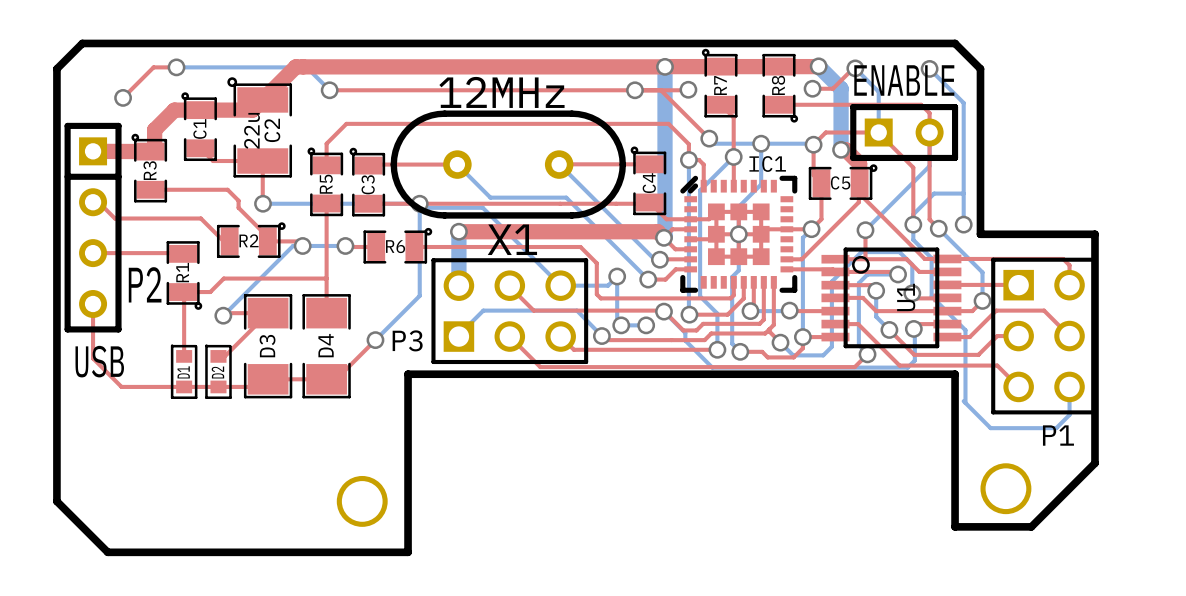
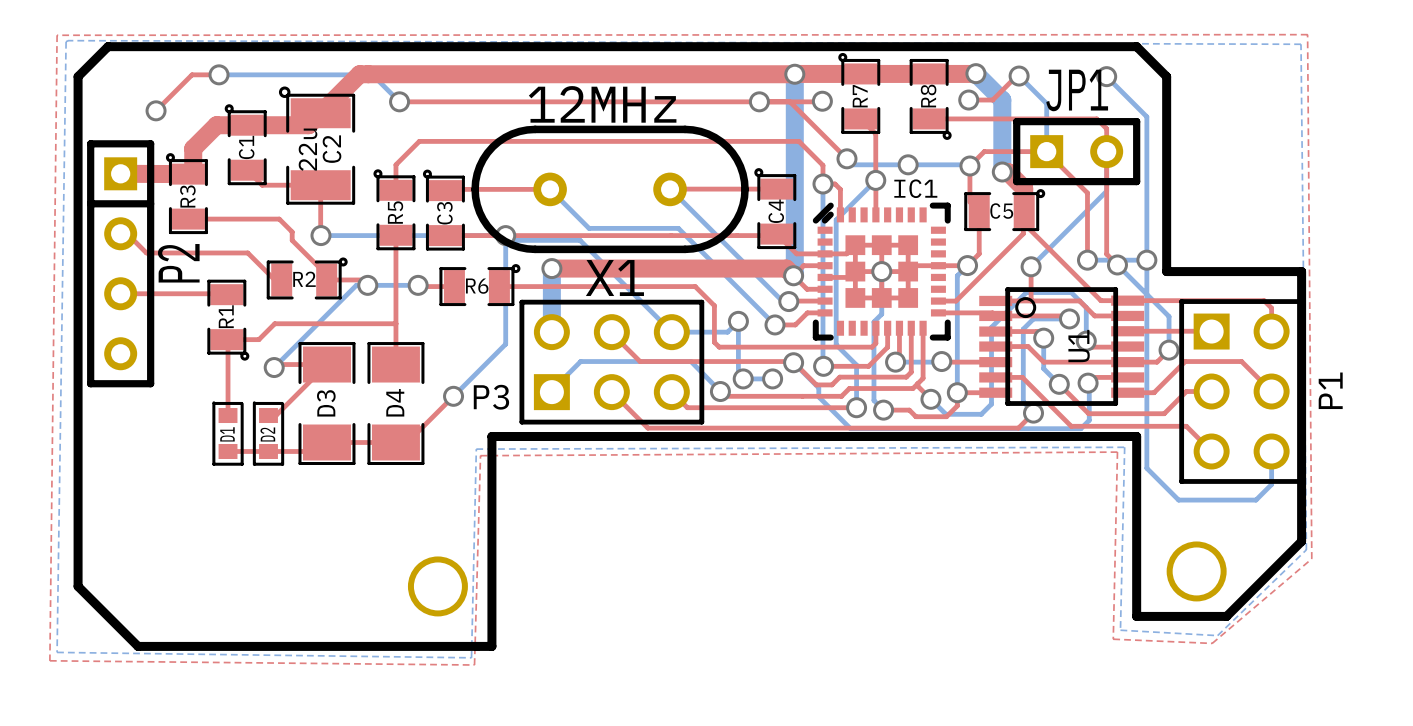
top zone outline: none -> (1307, 34) (1311, 558) (1212, 643) (1113, 639) (1117, 452) (480, 455) (474, 665) (49, 660) (57, 35) (1307, 34)
bottom zone outline: none -> (67, 40) (1301, 44) (1306, 549) (1217, 635) (1120, 630) (1124, 447) (476, 449) (471, 657) (57, 652) (66, 41) (67, 40)
JP1 name: none -> JP1 (1077, 90)
JP1 value: ENABLE (904, 80) -> none
bottom track: (761, 143) (761, 184) (738, 206) (738, 234) -> none
bottom track: (963, 193) (934, 193) (913, 214) (913, 239) (931, 258) (931, 296) (965, 330) (965, 402) -> none
bottom track: none -> (1087, 260) (1146, 260) (1146, 468)
P2 name rotation: 0° (145, 284) -> 90° counterclockwise (178, 263)
top track: (93, 303) (93, 358) (121, 386) (184, 386) -> none
P2 value: USB (99, 361) -> none
P1 name rotation: 0° (1058, 435) -> 90° counterclockwise (1330, 390)
P1 name position: P1 (1058, 435) -> P1 (1330, 390)

